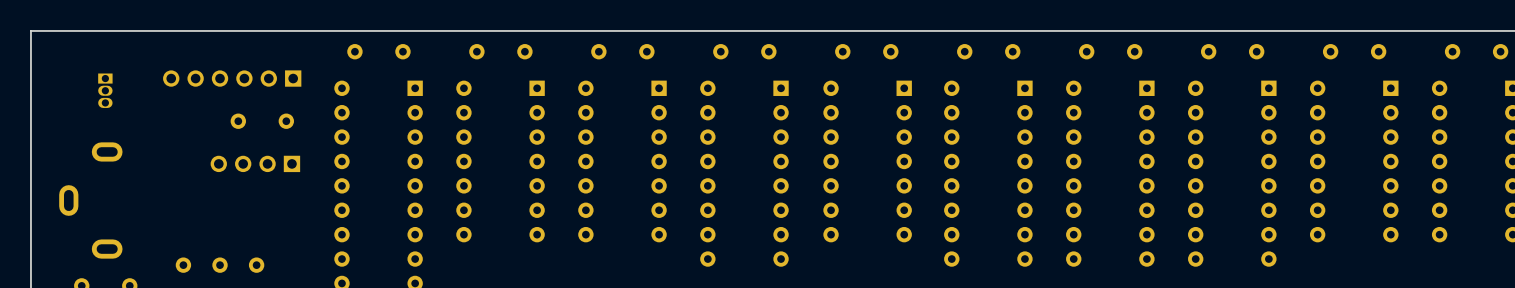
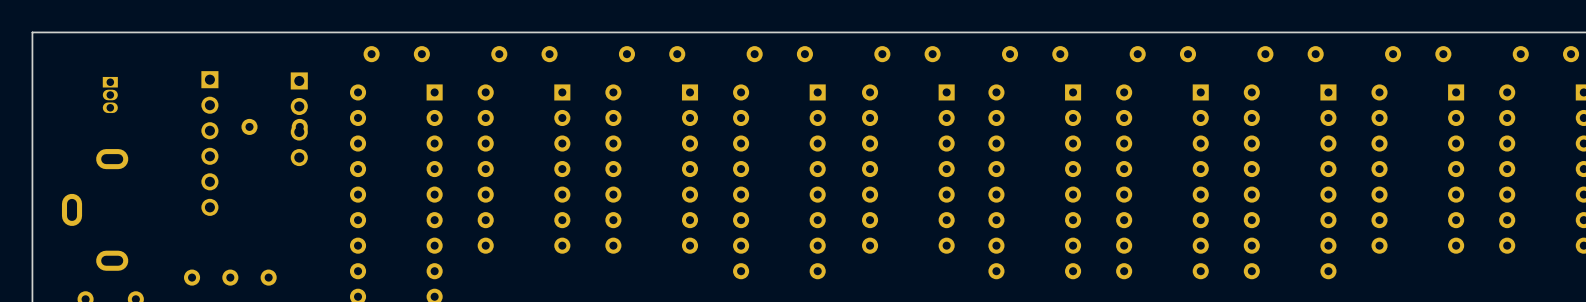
part rotation: 0° (232, 78) -> 90° counterclockwise (209, 143)
part rotation: 0° (255, 163) -> 90° counterclockwise (299, 119)
part position: (255, 163) -> (299, 119)

